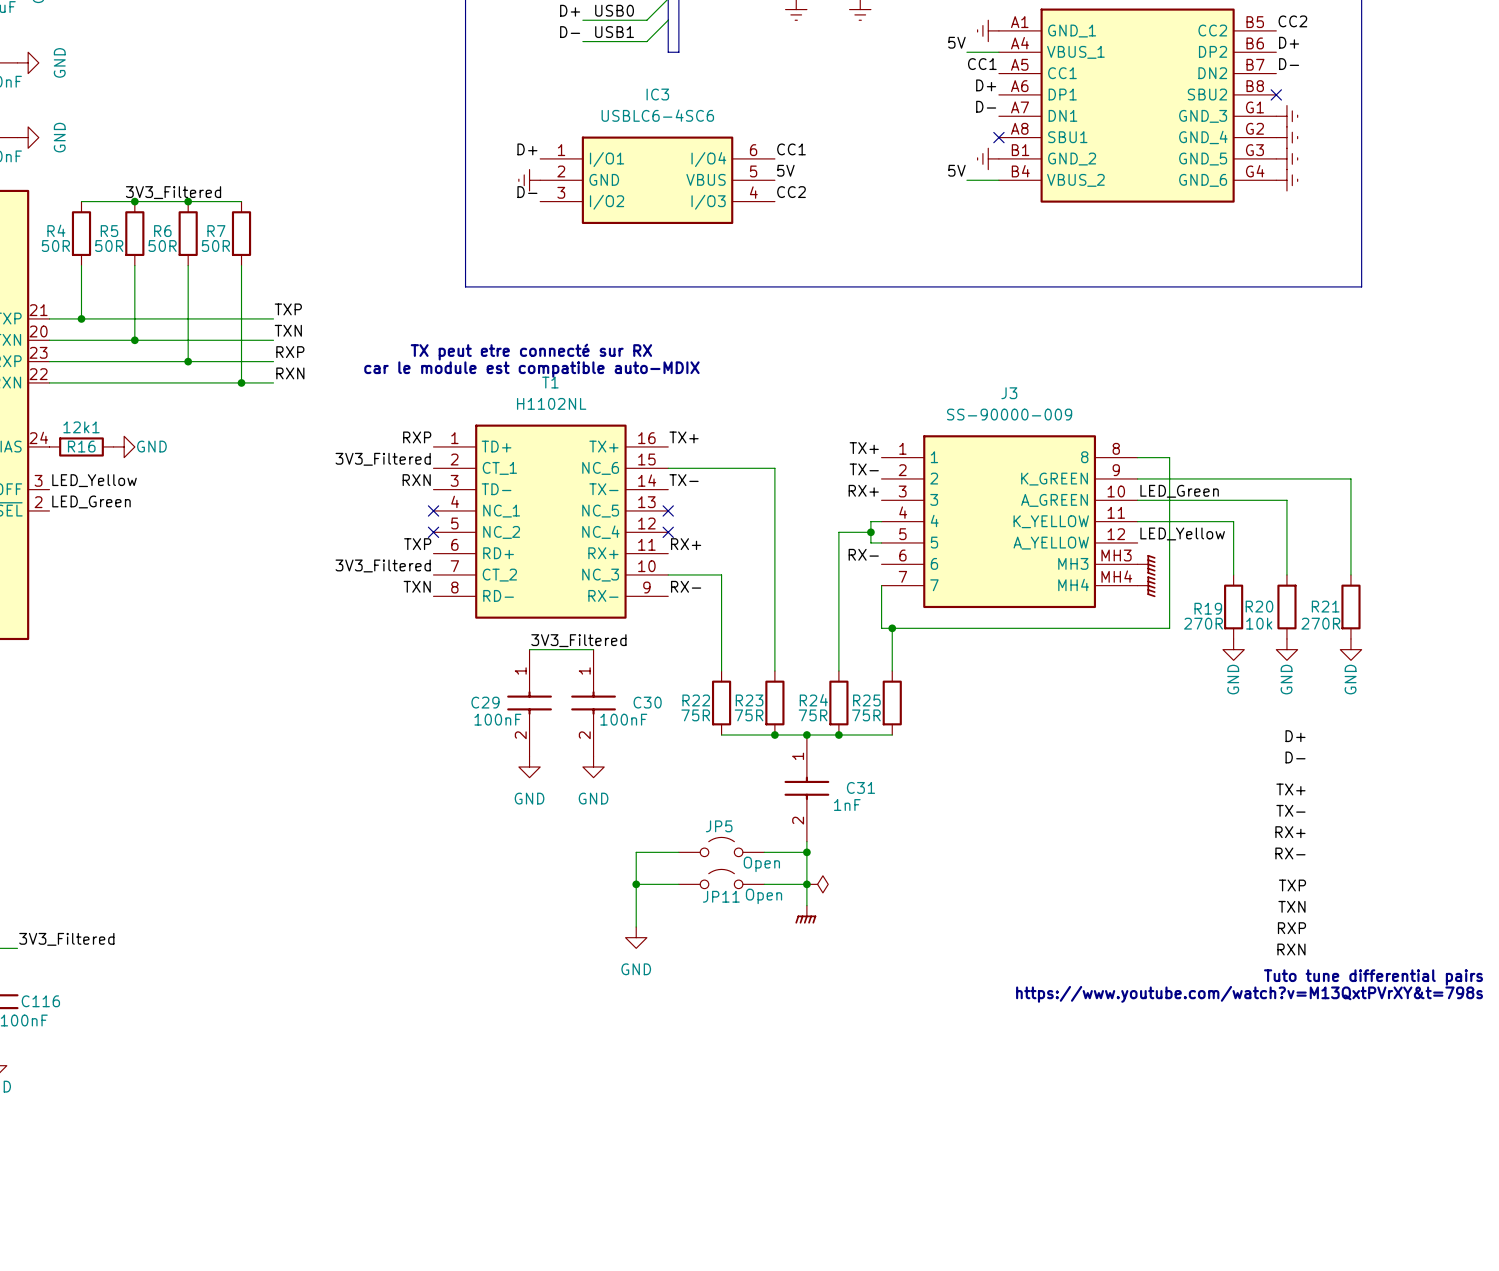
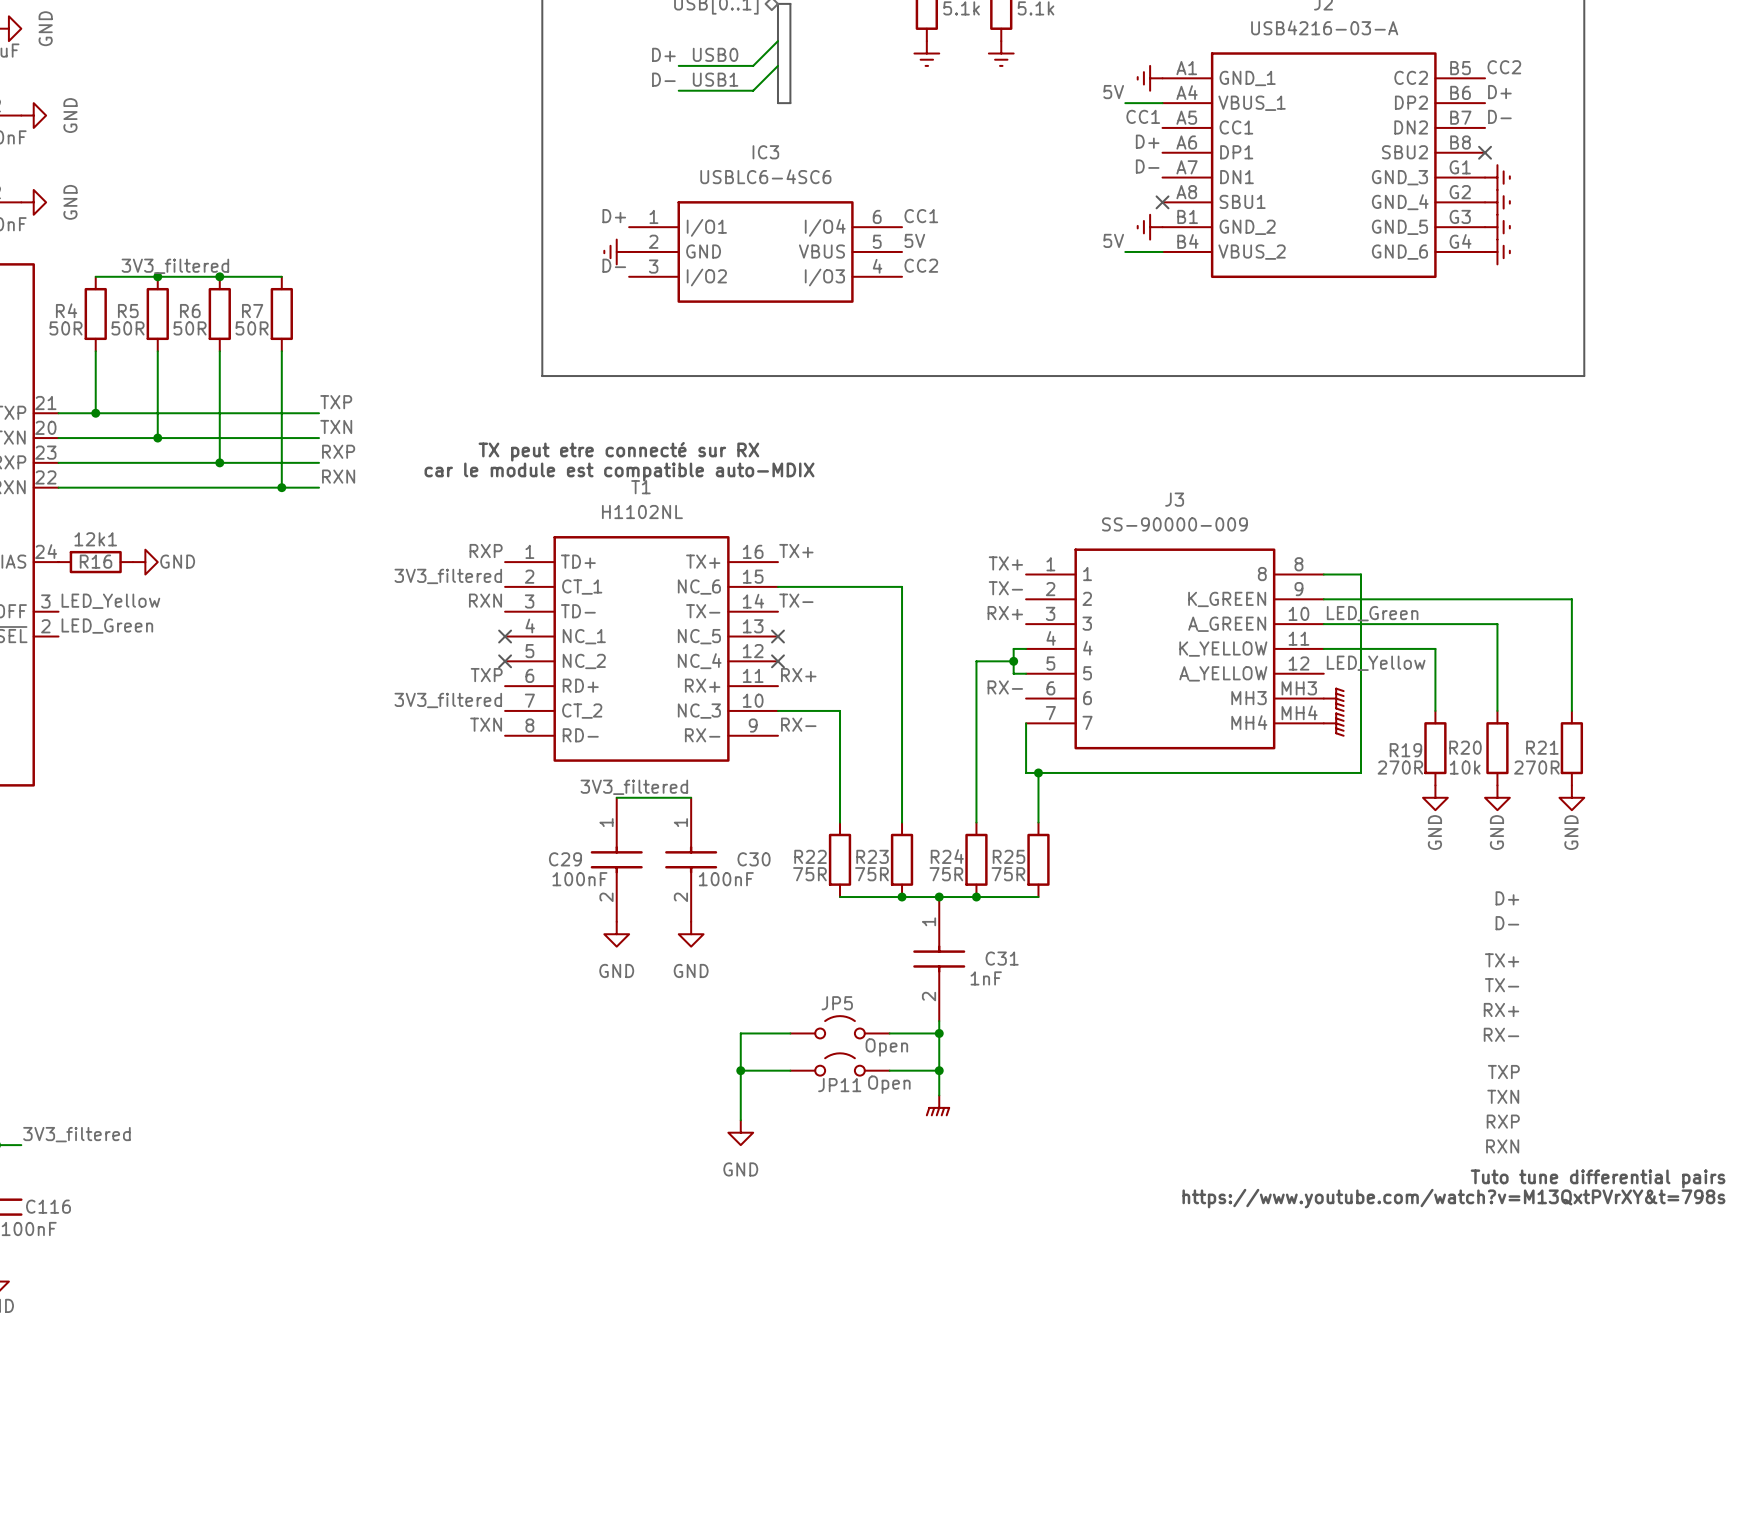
label: 3V3_Filtered (173, 192) -> 3V3_filtered (175, 266)
label: 3V3_Filtered (383, 459) -> 3V3_filtered (448, 576)
label: 3V3_Filtered (383, 565) -> 3V3_filtered (448, 700)
label: 3V3_Filtered (578, 640) -> 3V3_filtered (634, 787)
power symbol: (817, 884) -> none
label: 3V3_Filtered (66, 939) -> 3V3_filtered (76, 1134)

